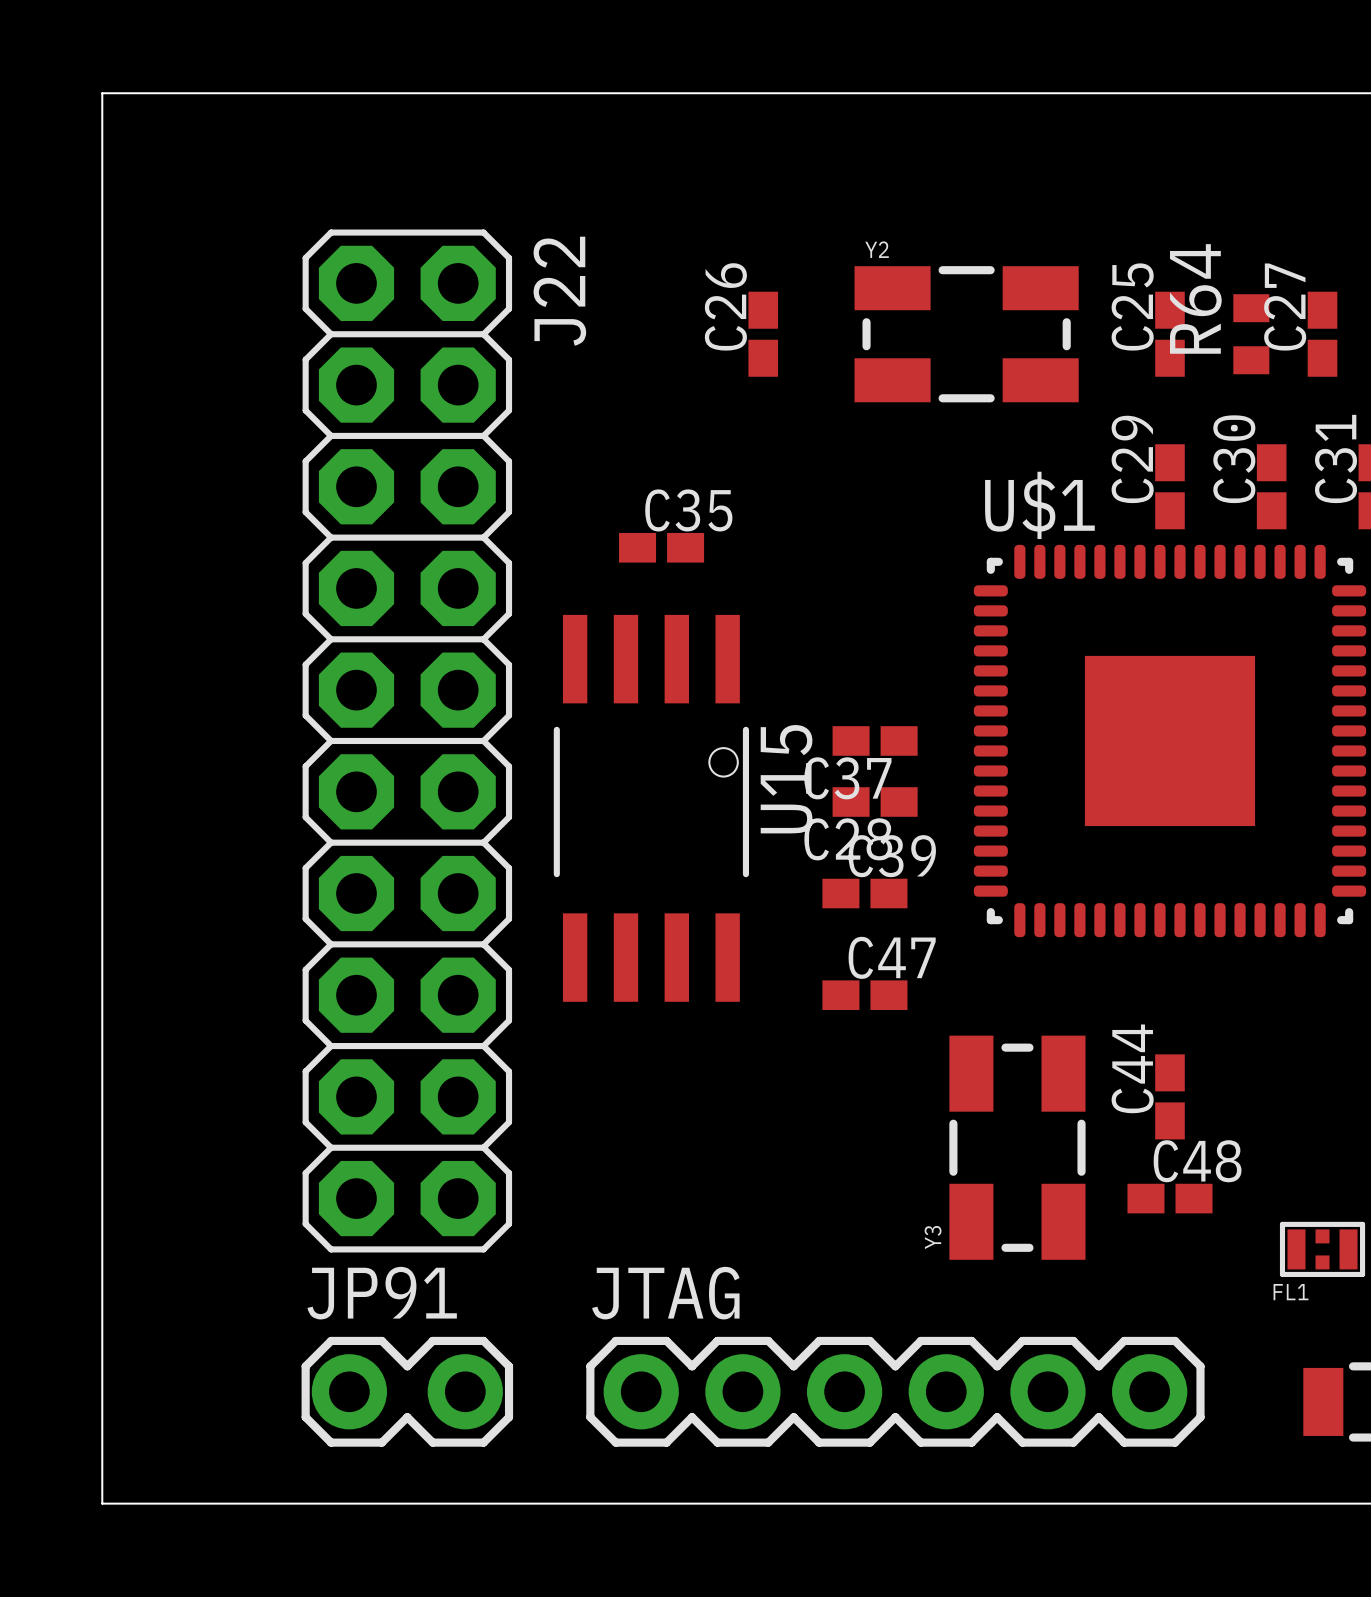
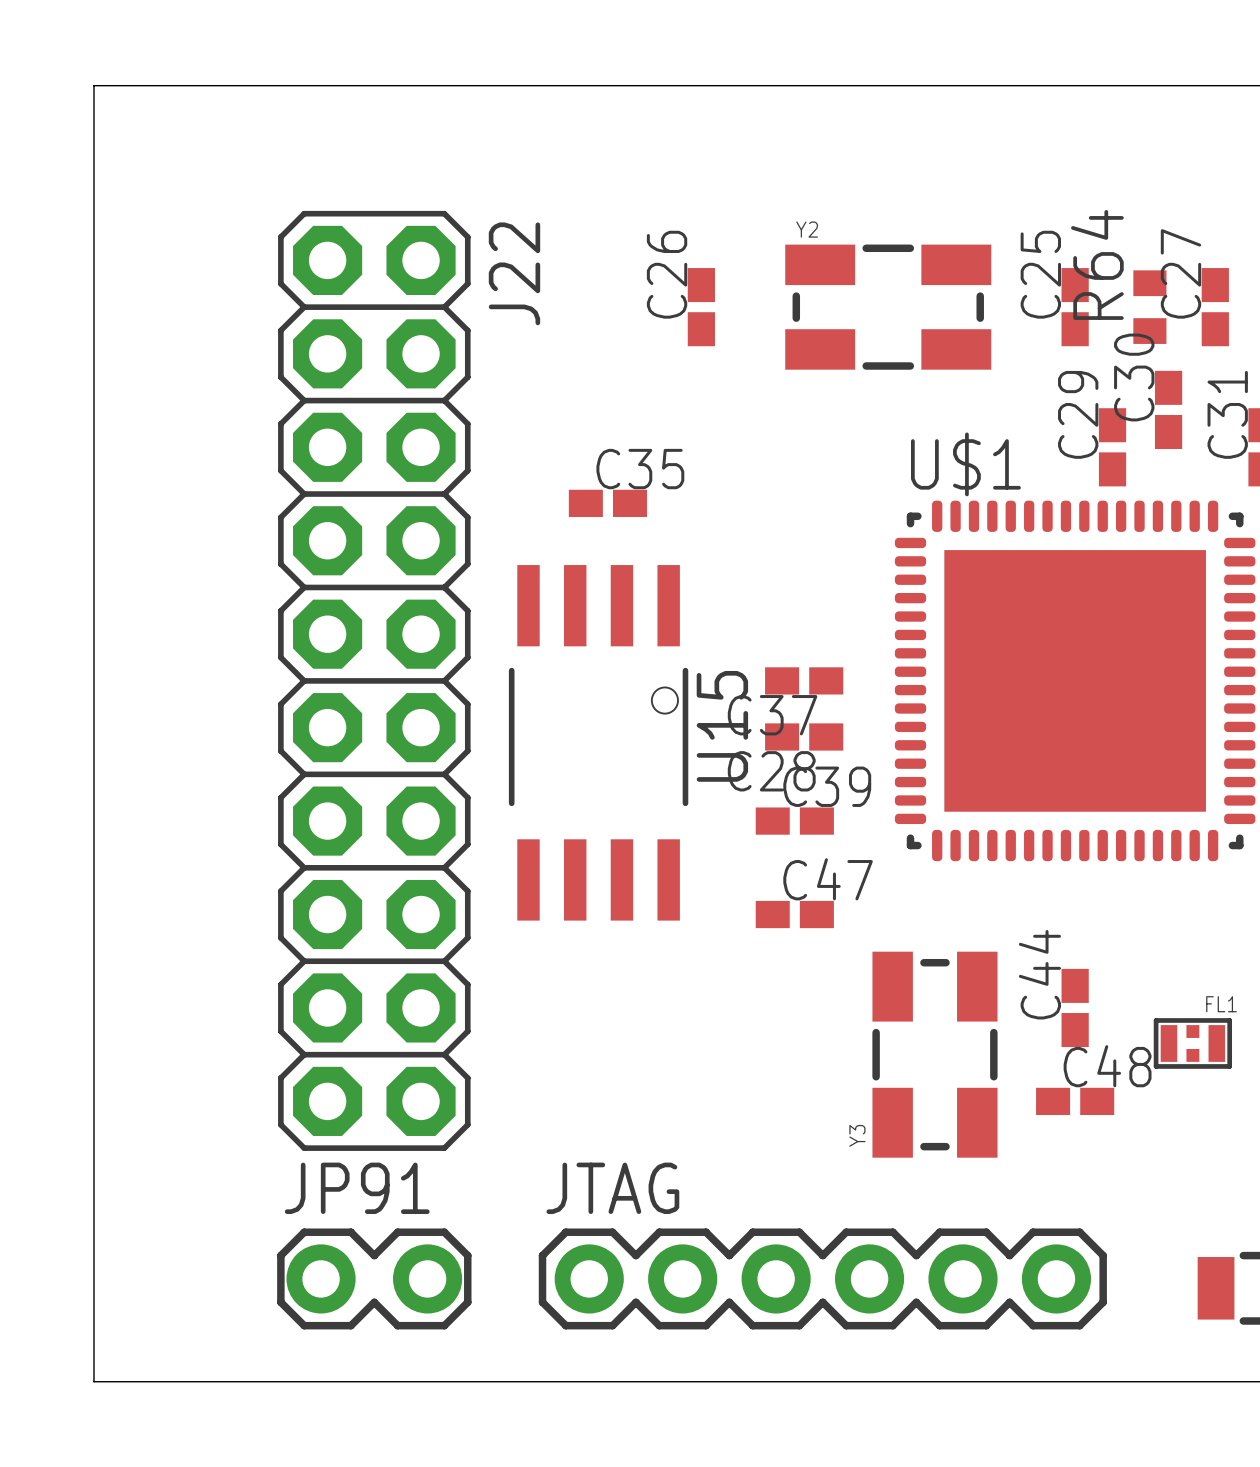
C29 position: (1169, 486) -> (1112, 447)
C30 position: (1271, 486) -> (1168, 409)
U$1 footprint: [973, 544, 1367, 938] -> [894, 500, 1256, 862]
FL1 position: (1322, 1249) -> (1192, 1043)
FL1 name position: FL1 (1291, 1292) -> FL1 (1221, 1004)

